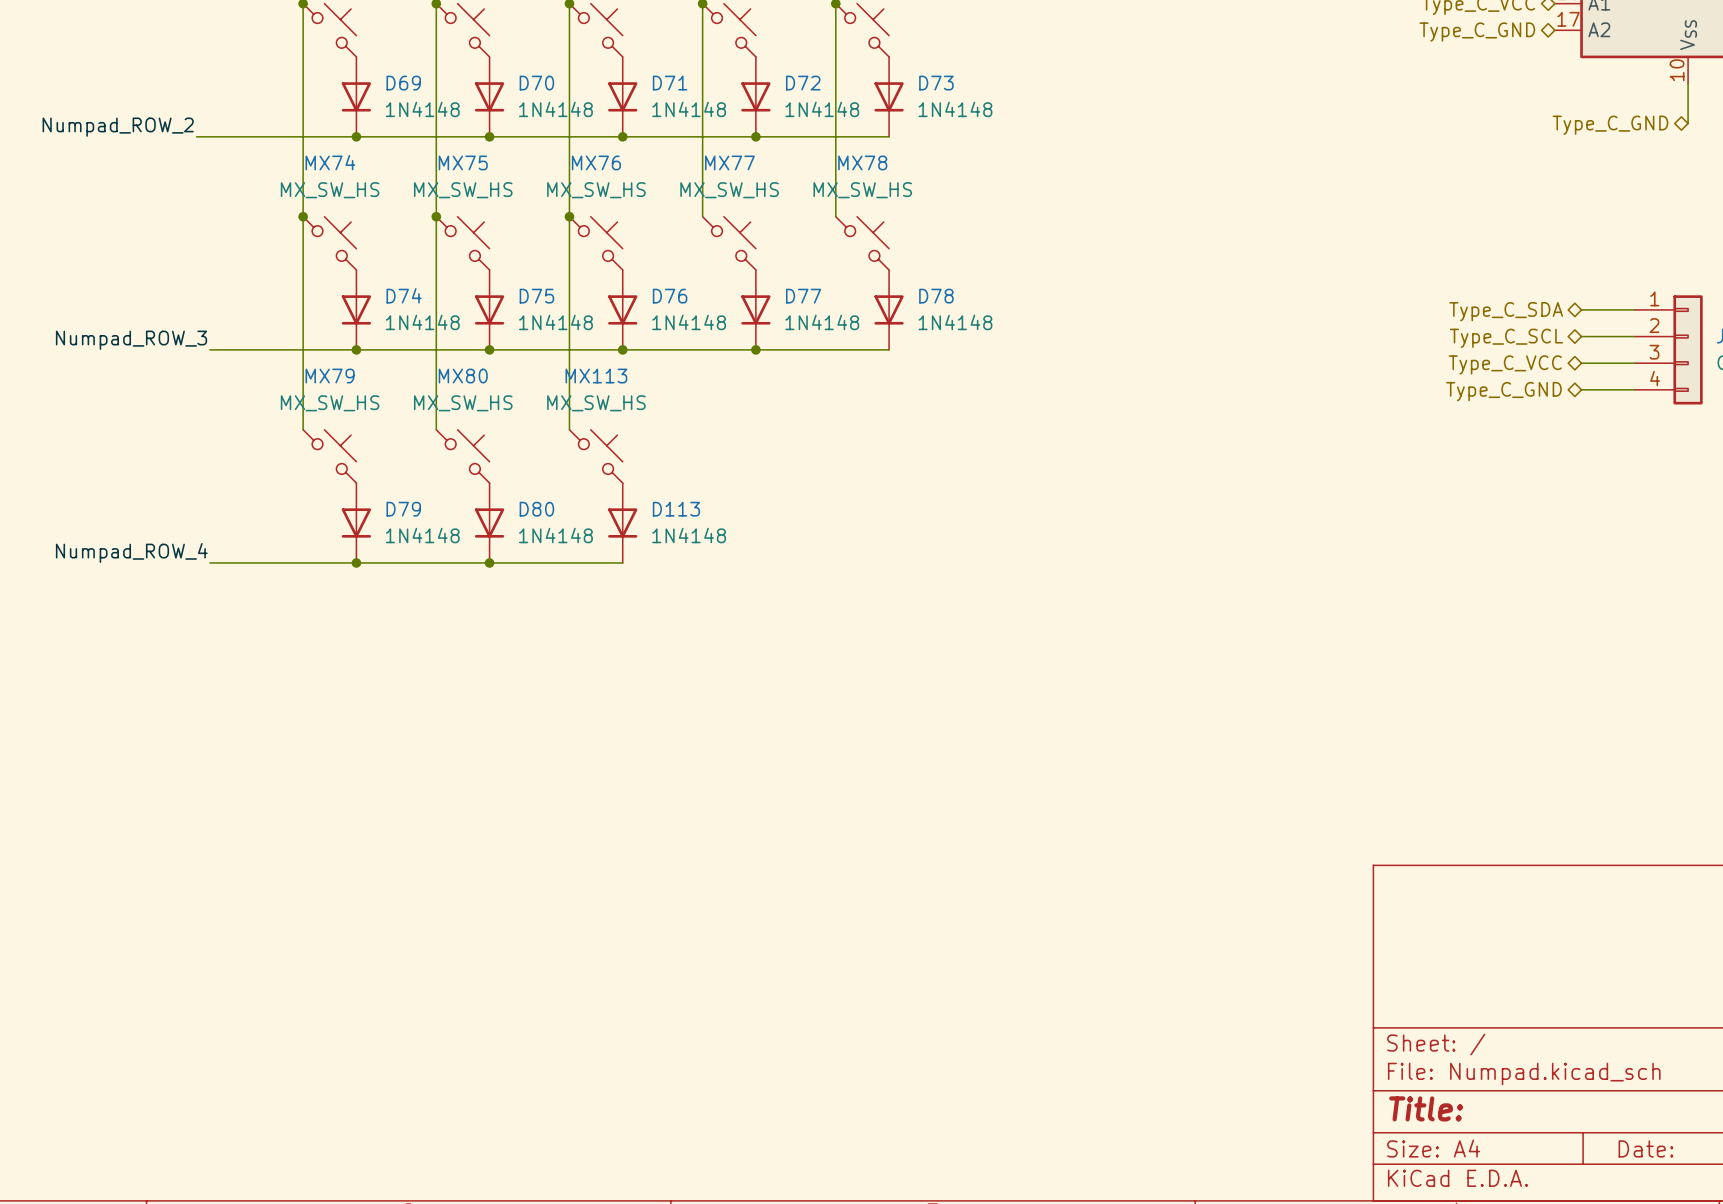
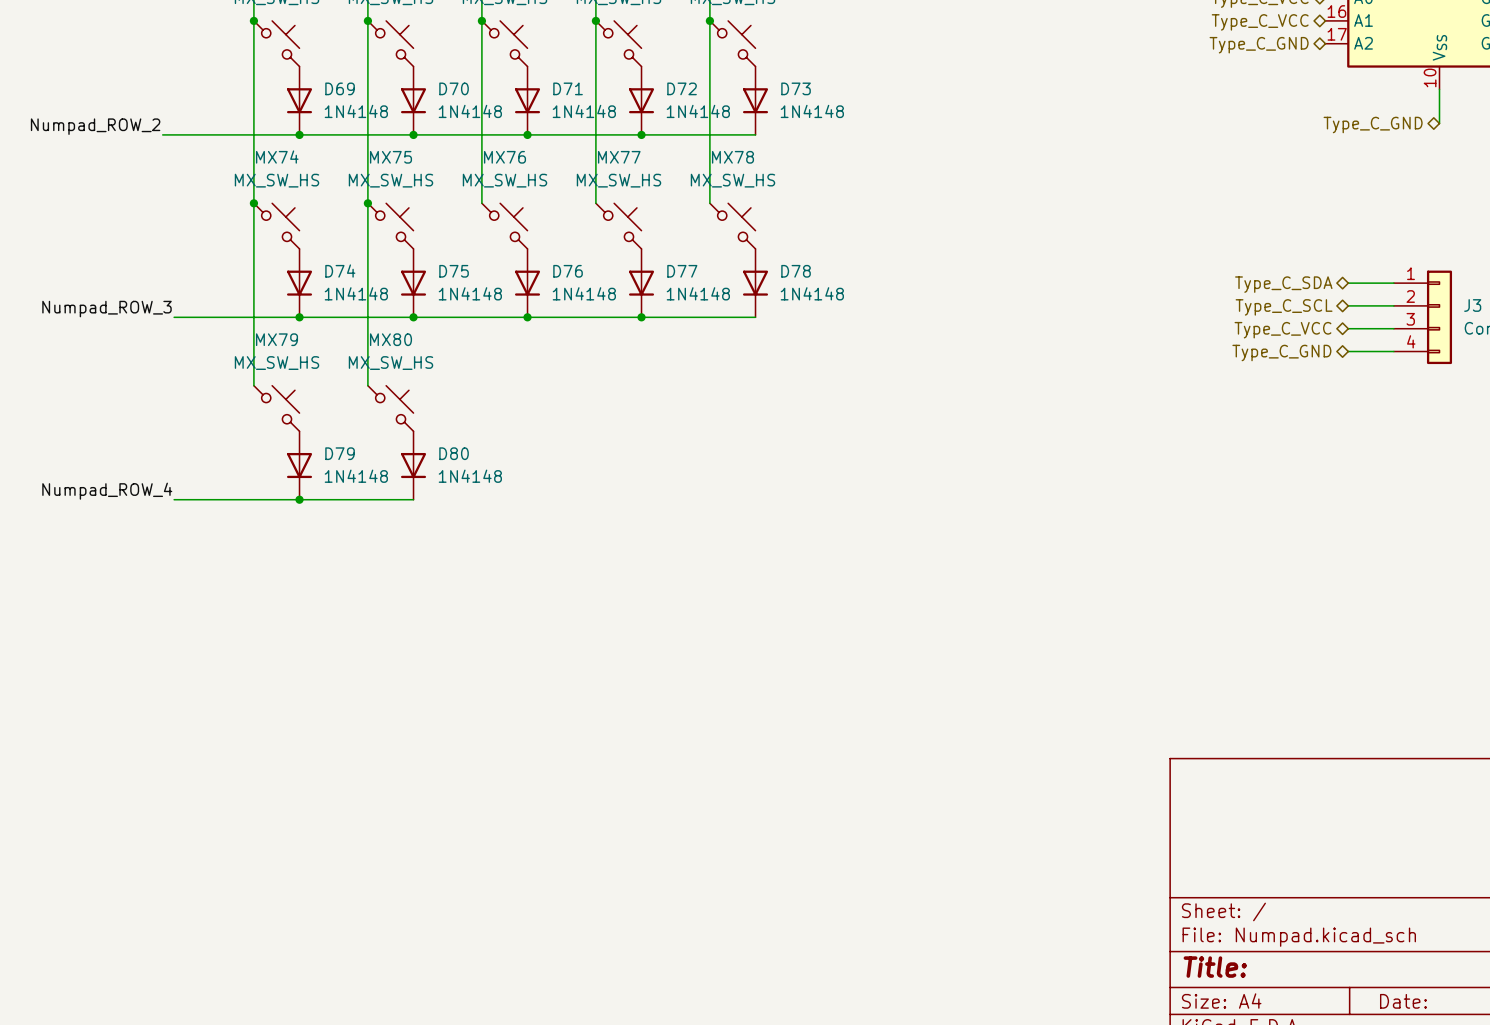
wire: (569, 216) (569, 429) -> none
junction: (569, 216) -> none
MX113: MX_SW_HS (596, 456) -> none
D113: 1N4148 (622, 523) -> none
wire: (489, 562) (622, 562) -> none
junction: (489, 562) -> none

